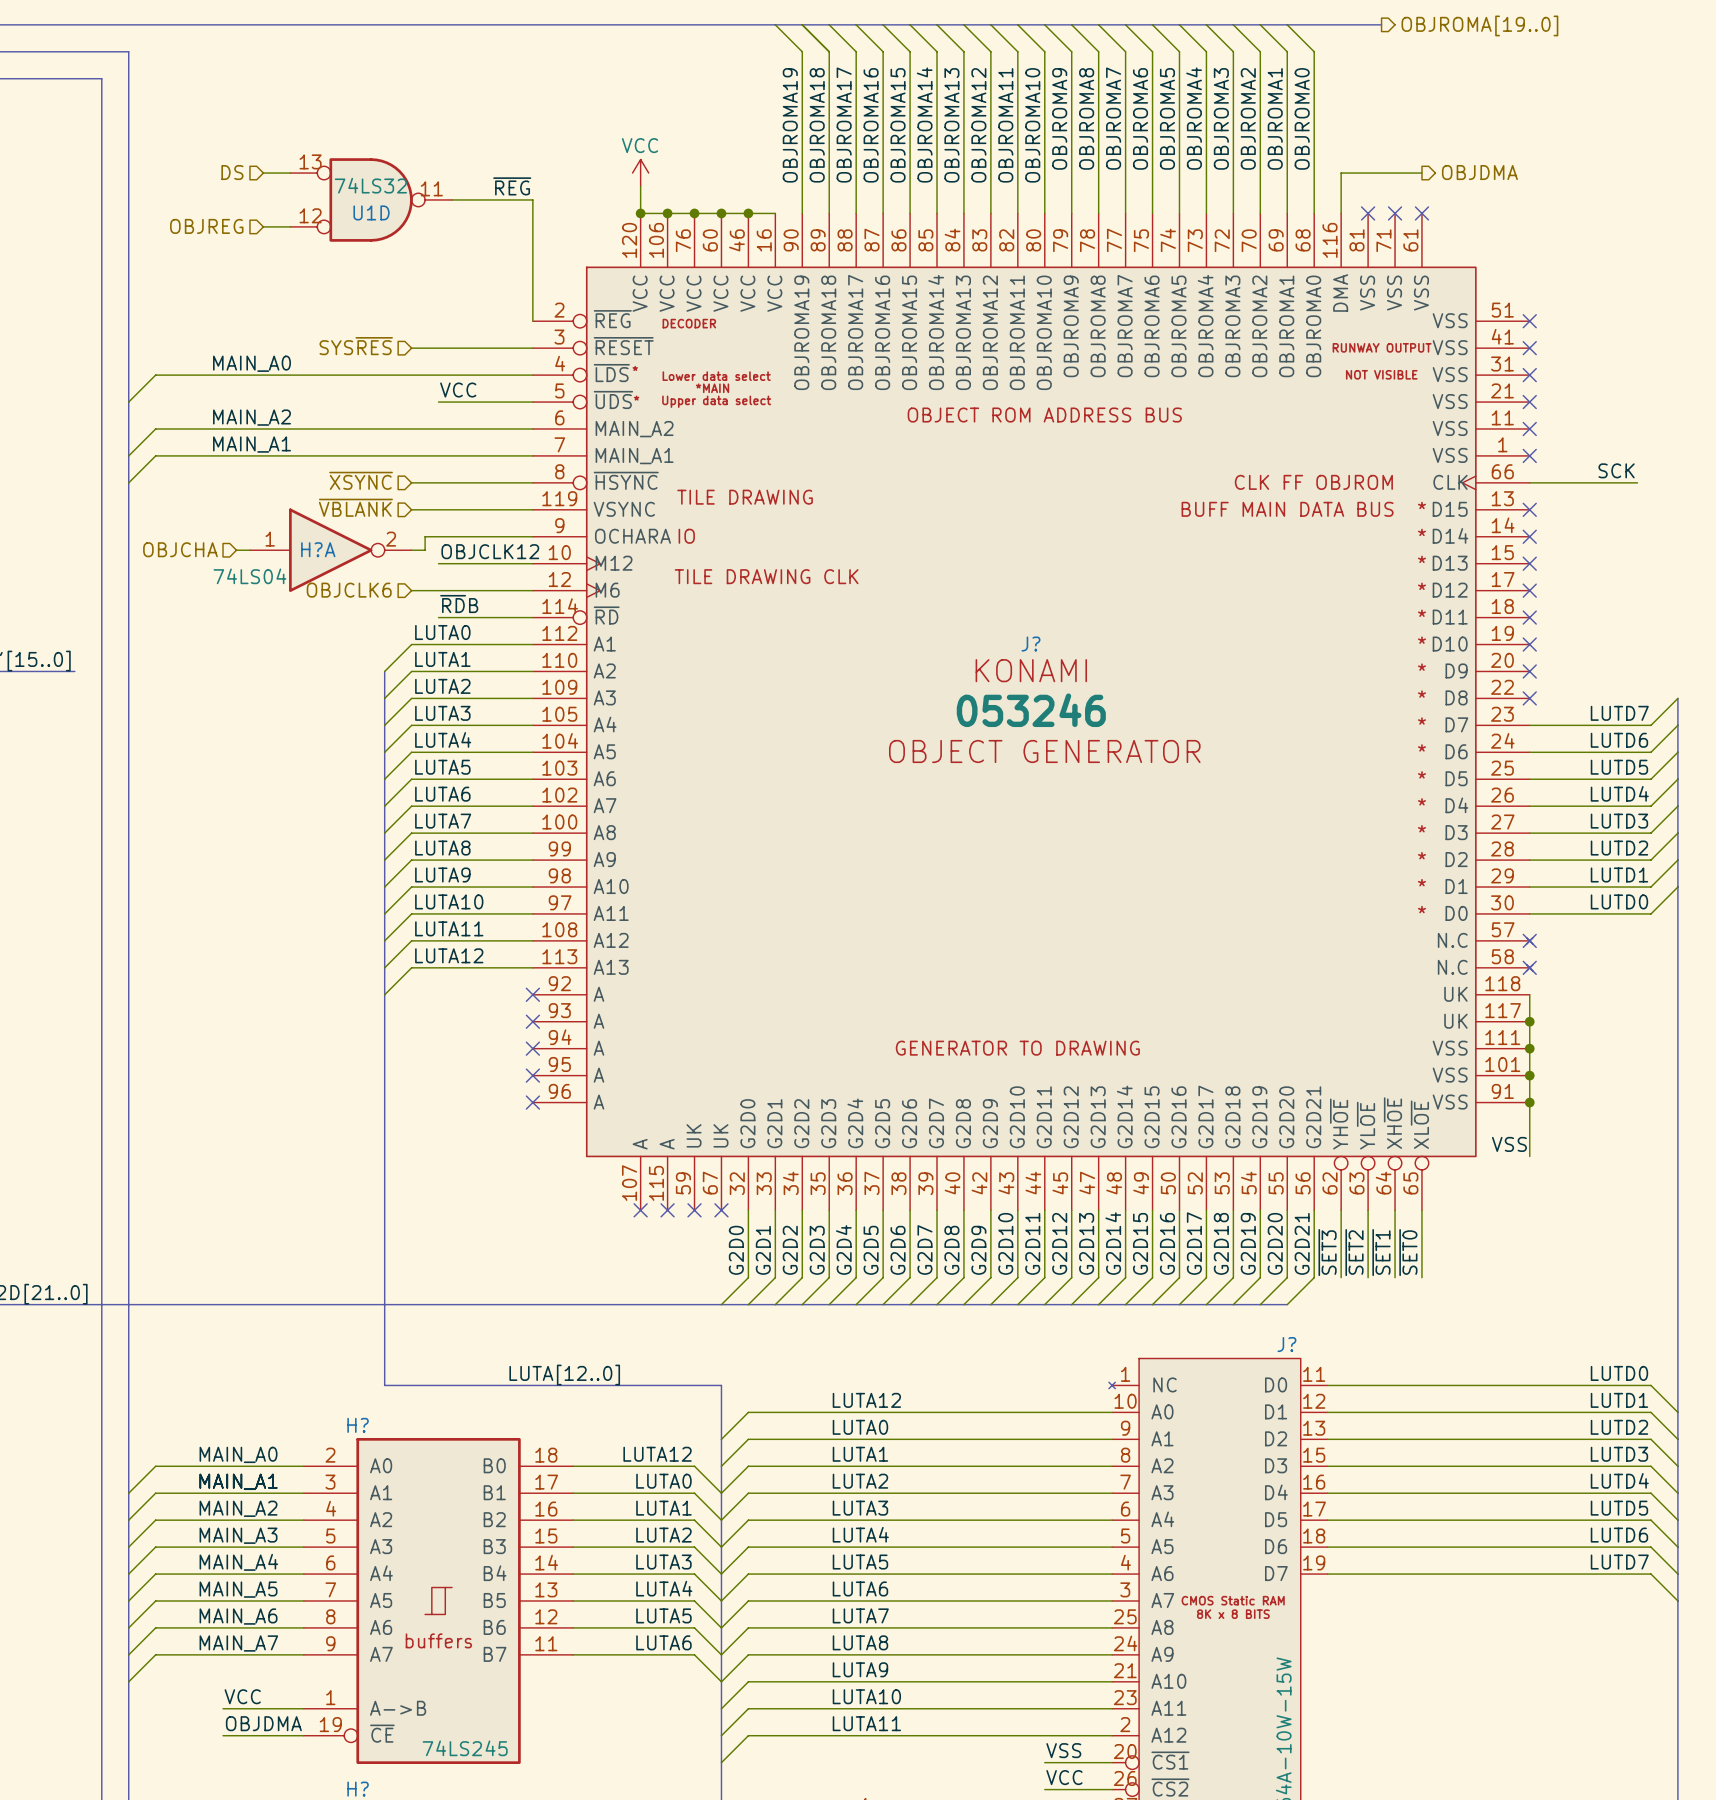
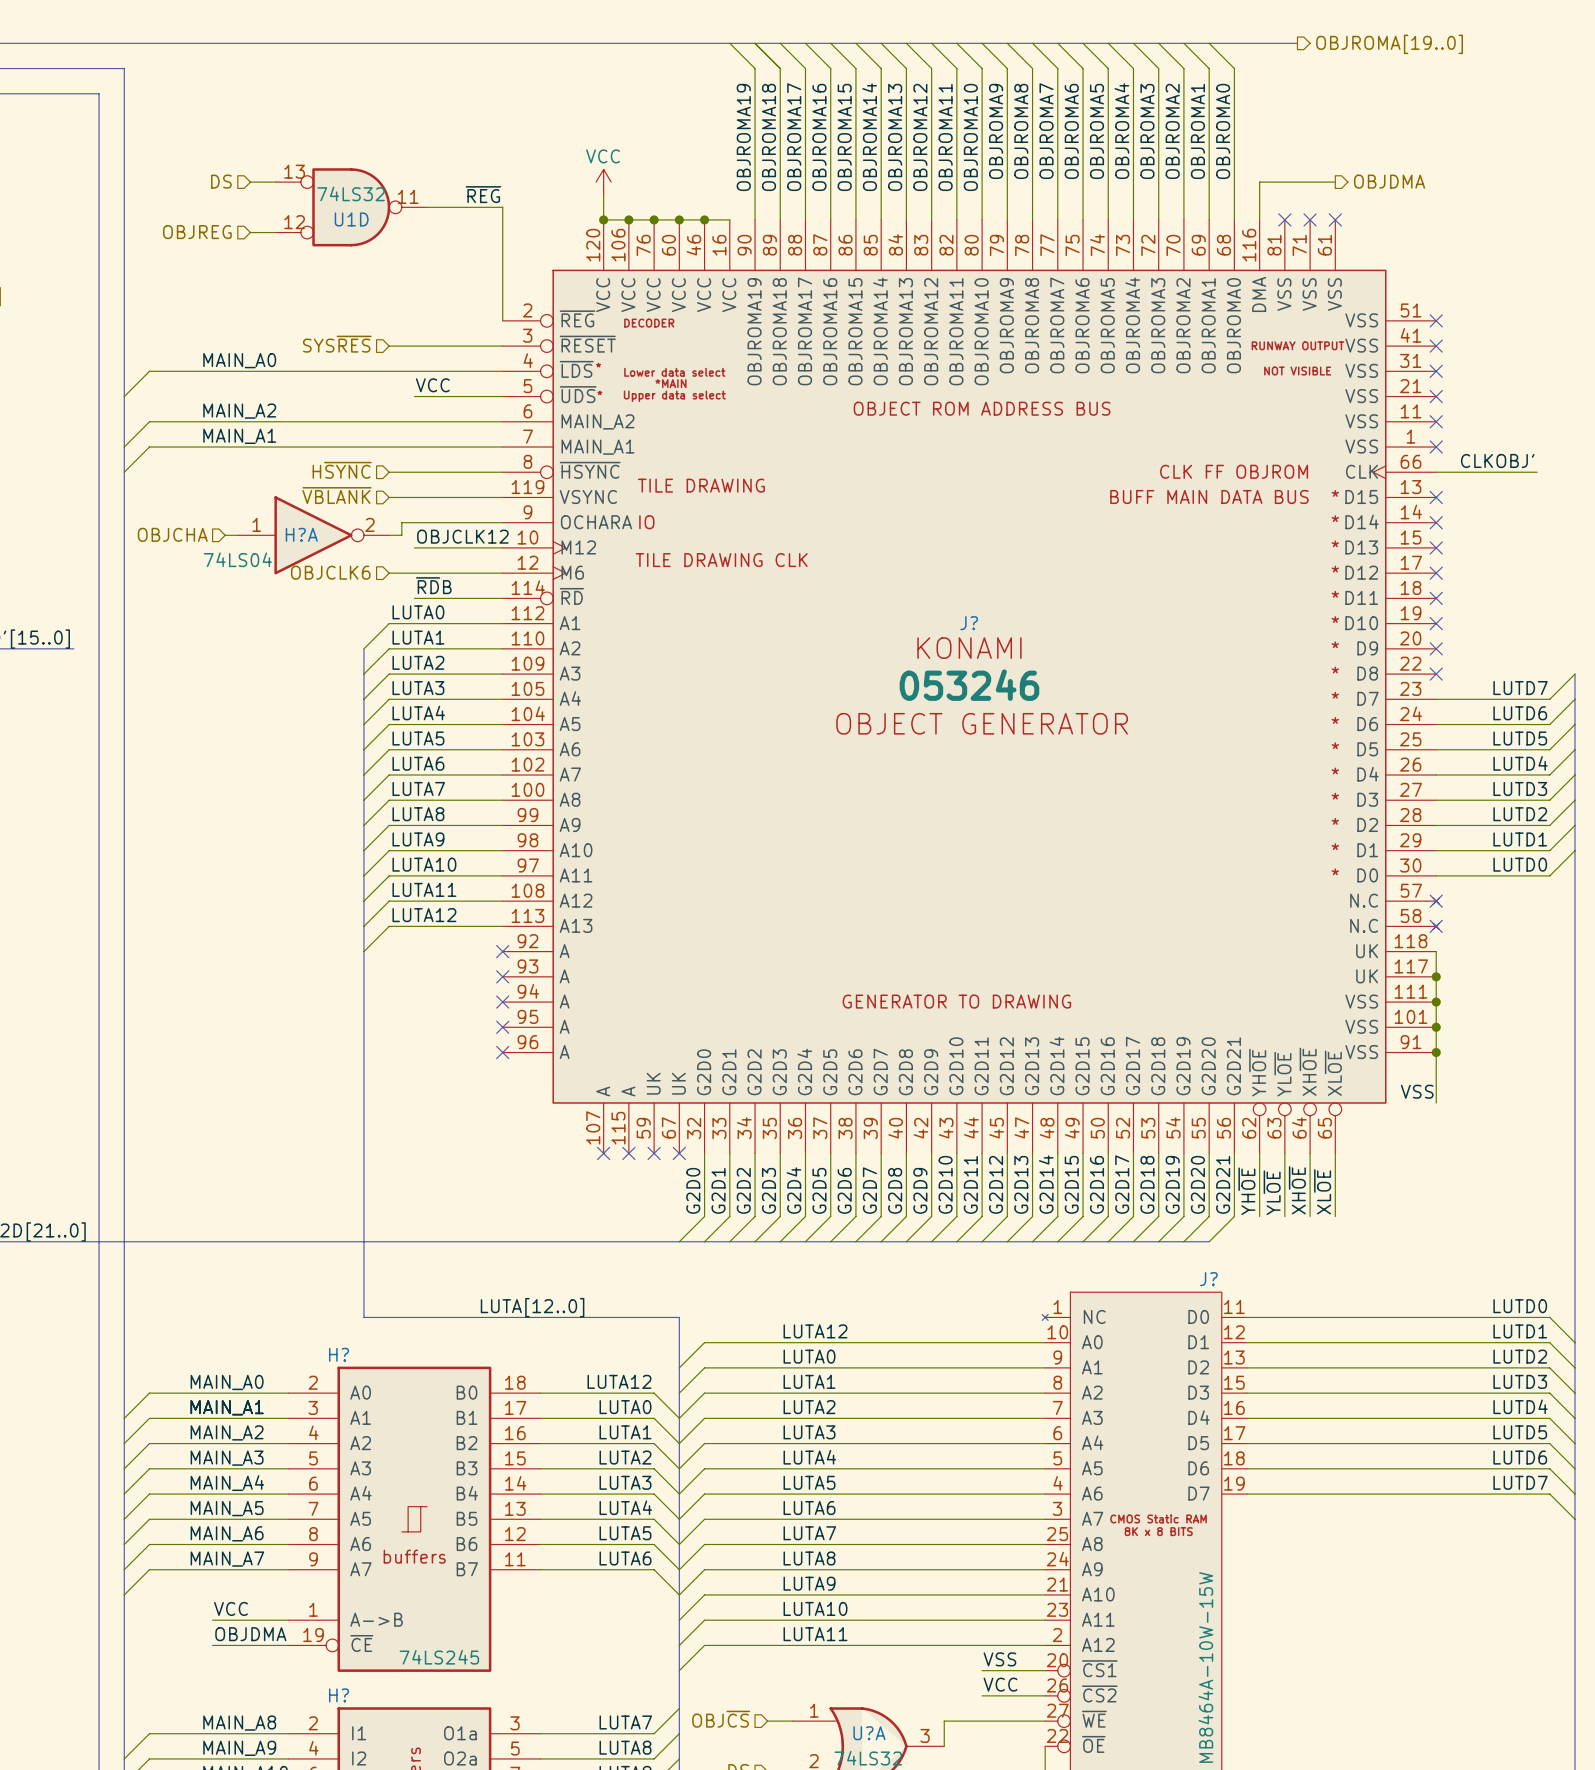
label: SCK (1616, 470) -> CLKOBJ' (1497, 460)
hierarchical label: ~{XSYNC} (361, 480) -> H~{SYNC} (342, 470)
label: ~{SET3} (1327, 1252) -> YH~{OE} (1246, 1191)
label: ~{SET2} (1354, 1252) -> YL~{OE} (1272, 1192)
label: ~{SET1} (1381, 1252) -> XH~{OE} (1297, 1190)
label: ~{SET0} (1408, 1252) -> XL~{OE} (1322, 1191)

